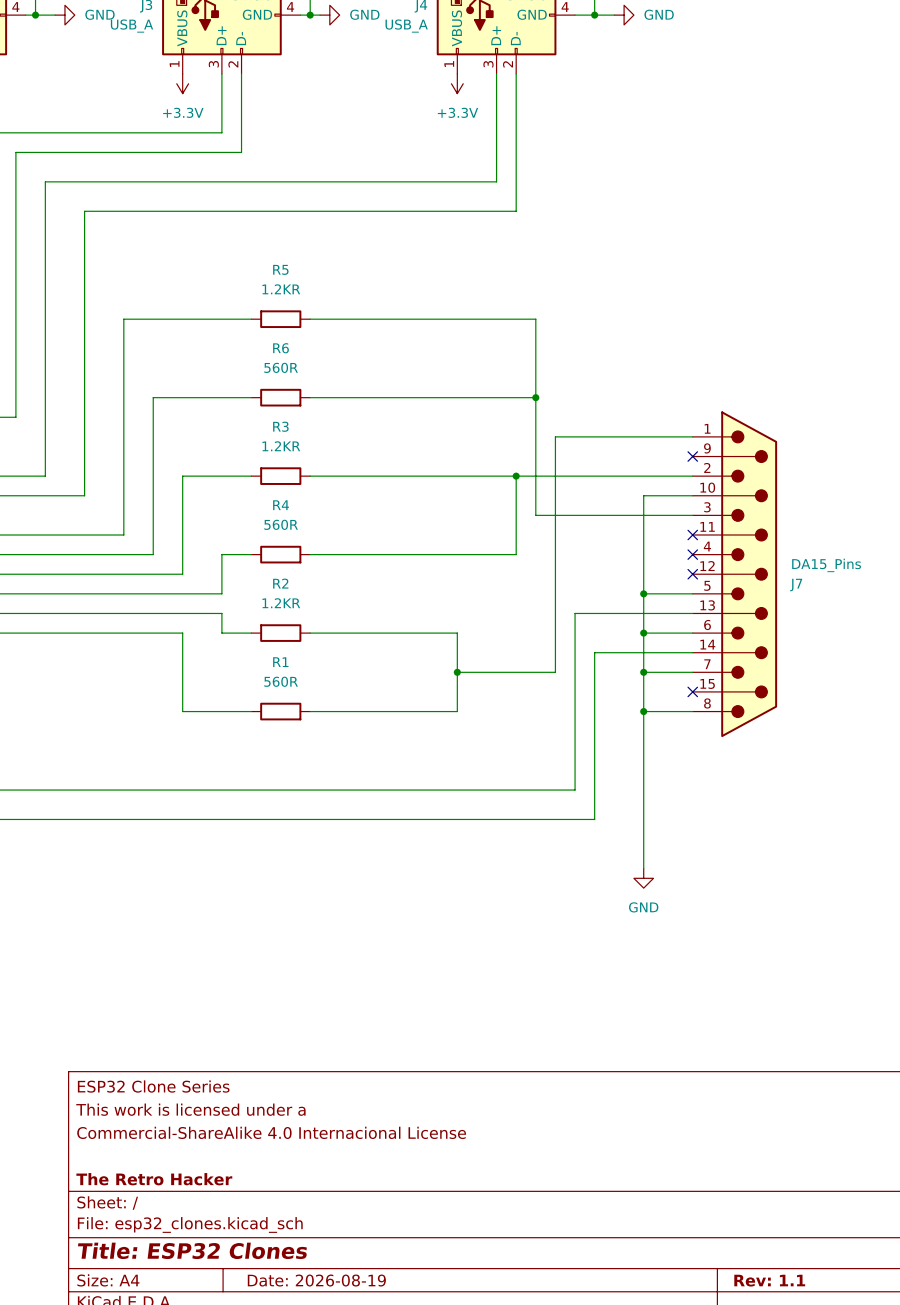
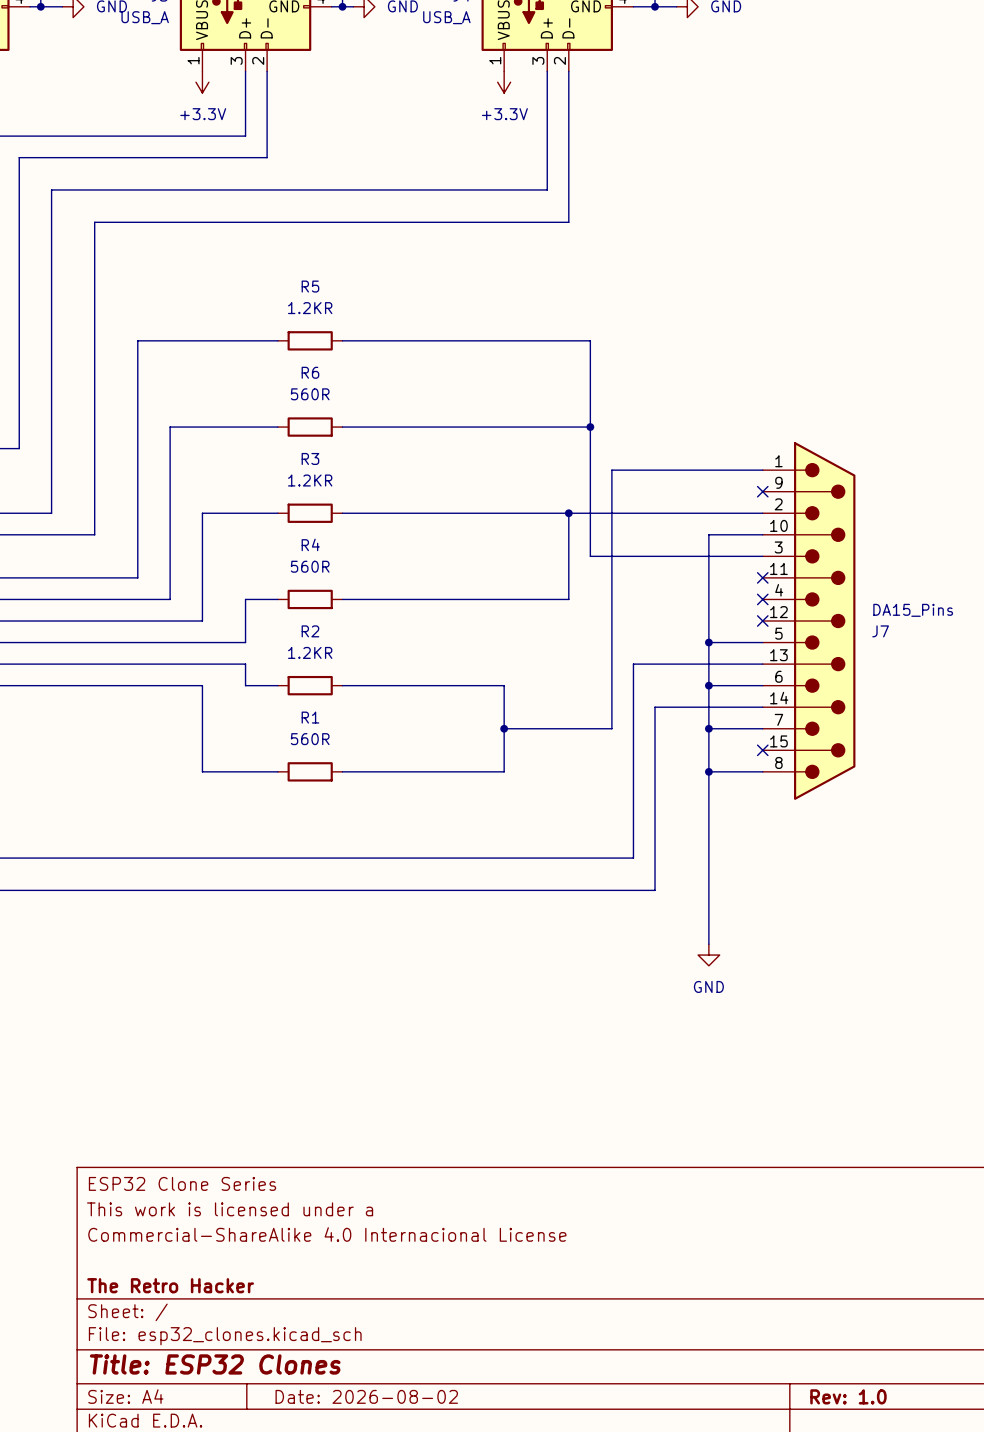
title block: Date: 2026-08-19 (316, 1280) -> Date: 2026-08-02 (366, 1396)
title block: Rev: 1.1 (769, 1280) -> Rev: 1.0 (848, 1396)

